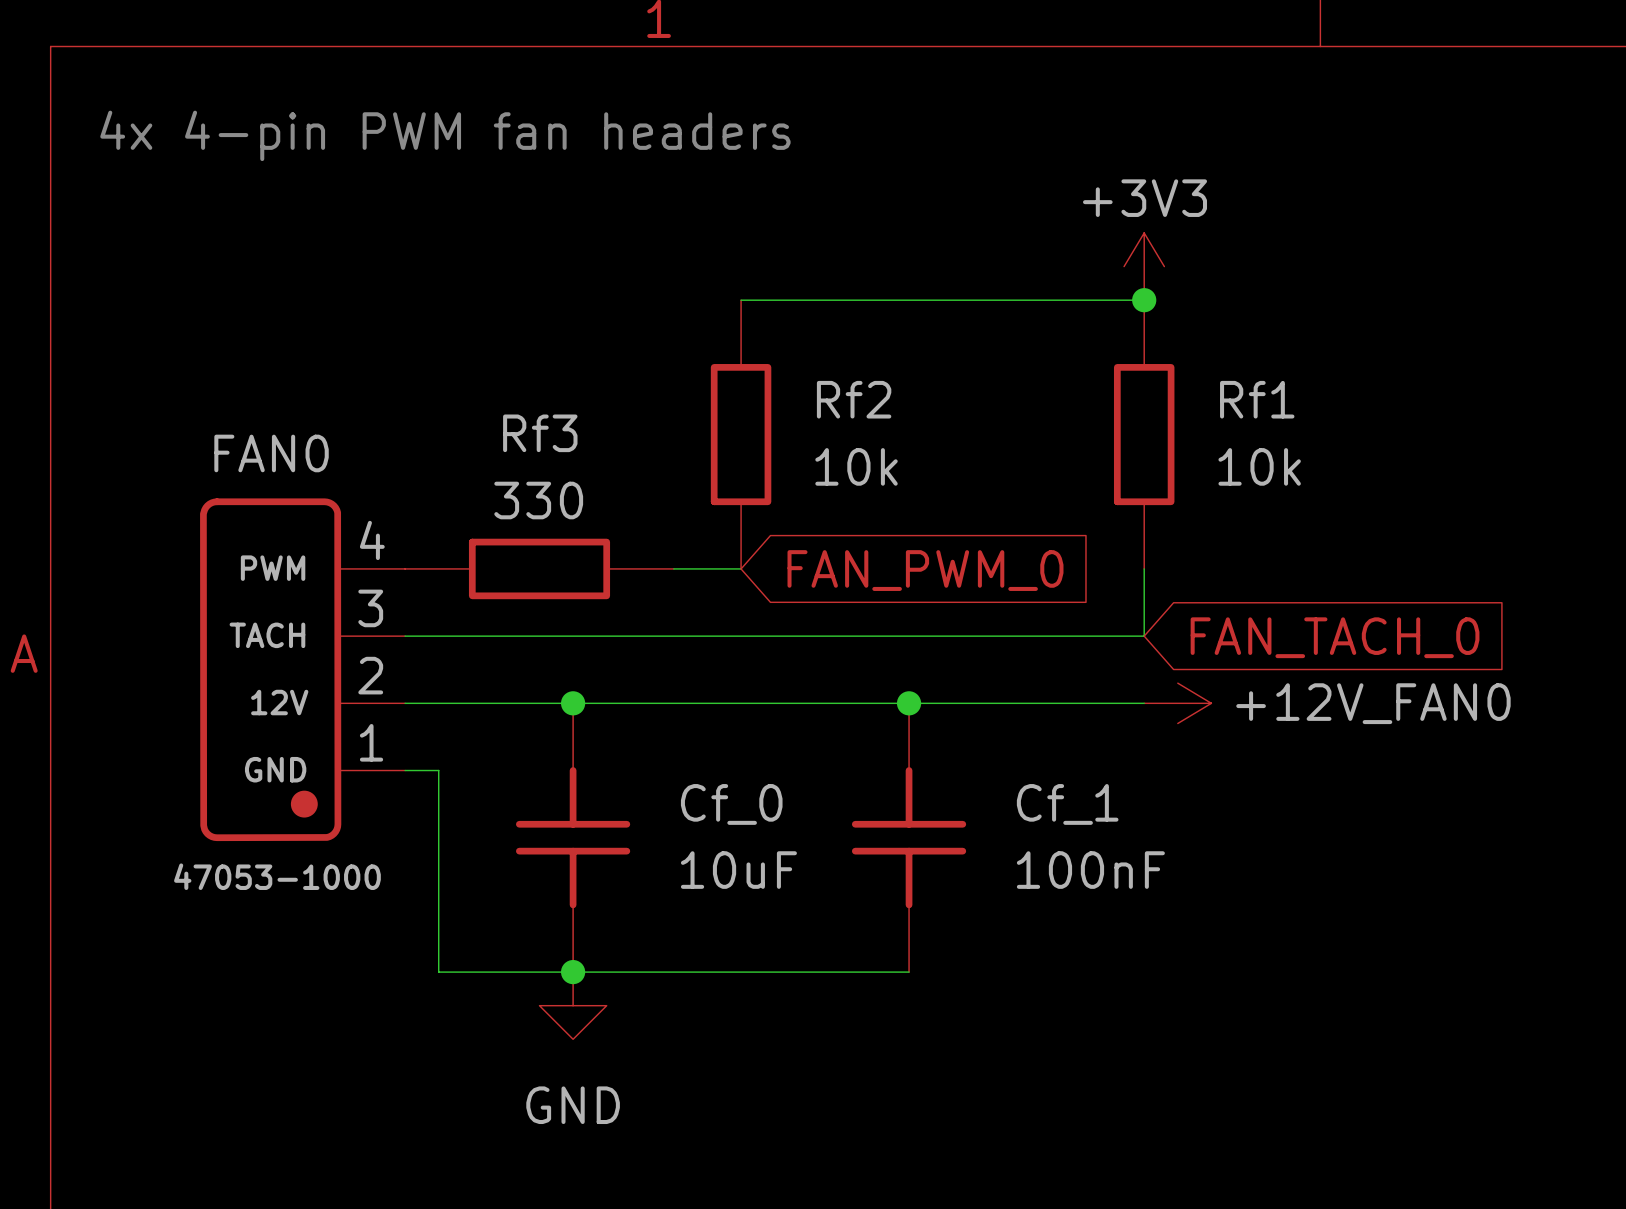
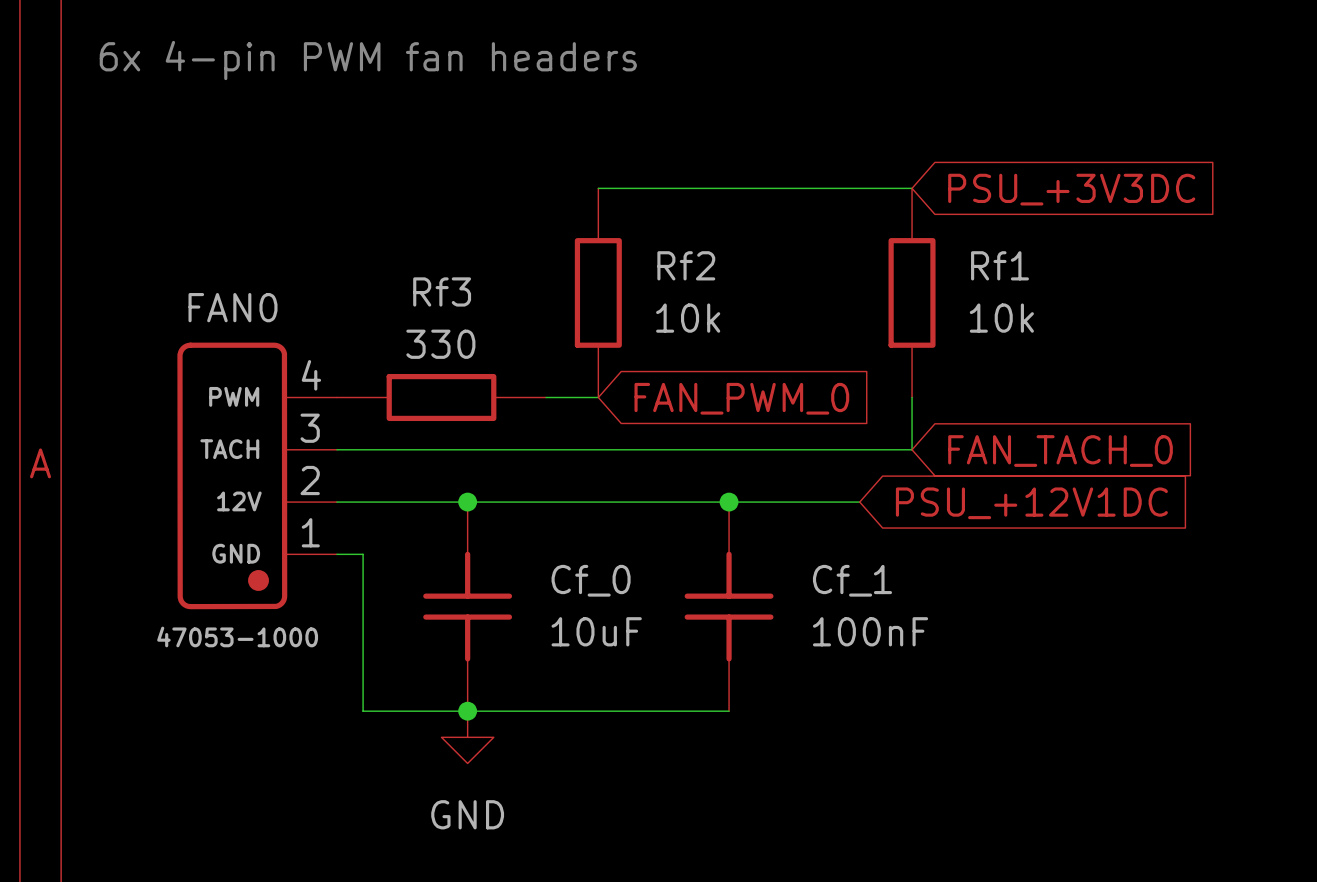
text: 4x 4-pin PWM fan headers (445, 135) -> 6x 4-pin PWM fan headers (368, 60)
power symbol: +3V3 (1144, 266) -> none
junction: (1144, 300) -> none
global label: none -> PSU_+3V3DC (1071, 189)
wire: (1077, 703) (1144, 703) -> none
power symbol: +12V_FAN0 (1177, 703) -> none
global label: none -> PSU_+12V1DC (1031, 503)

